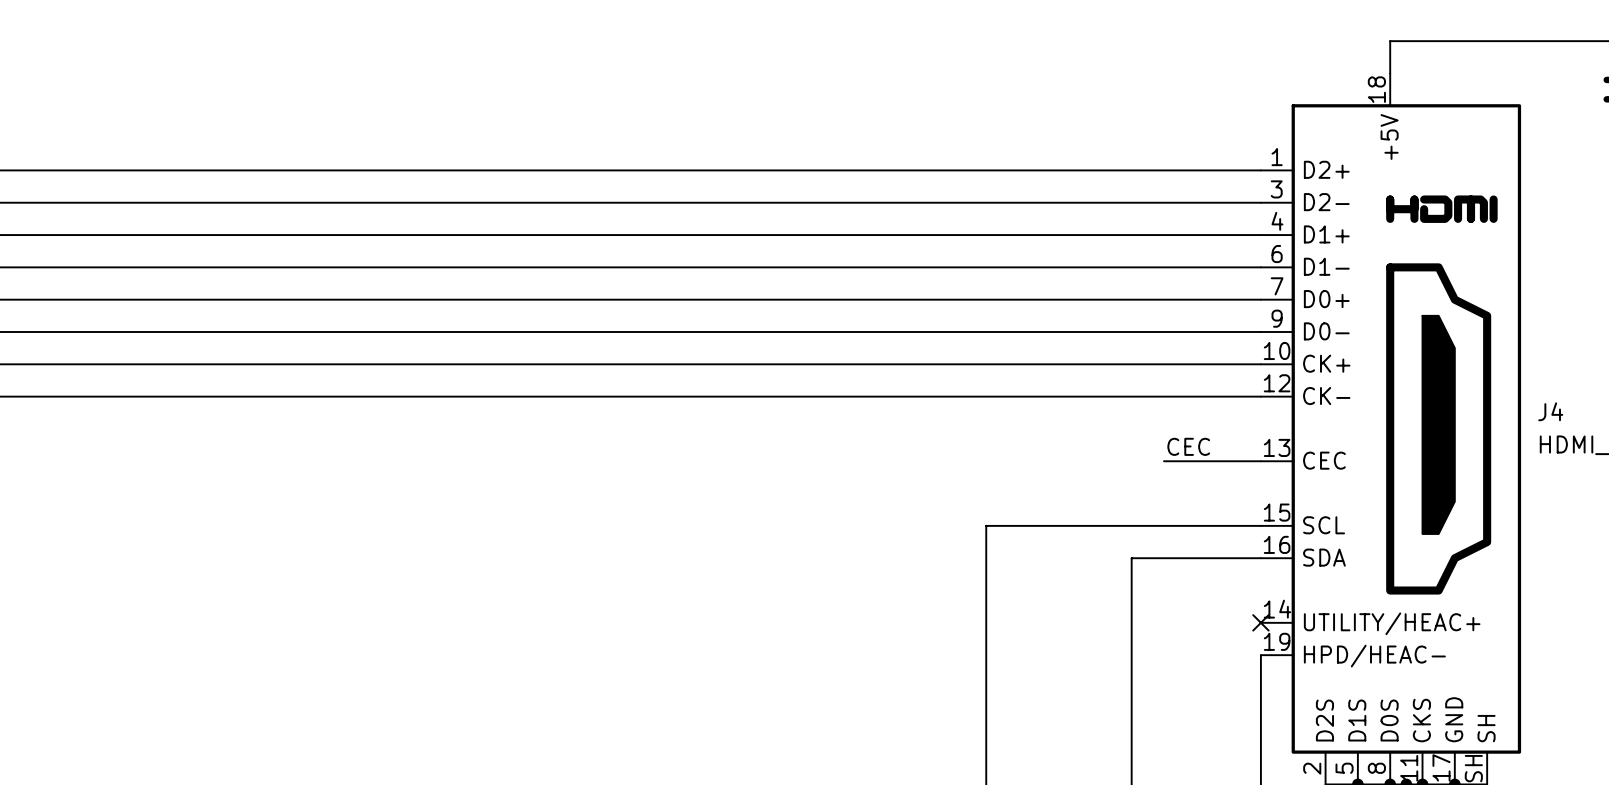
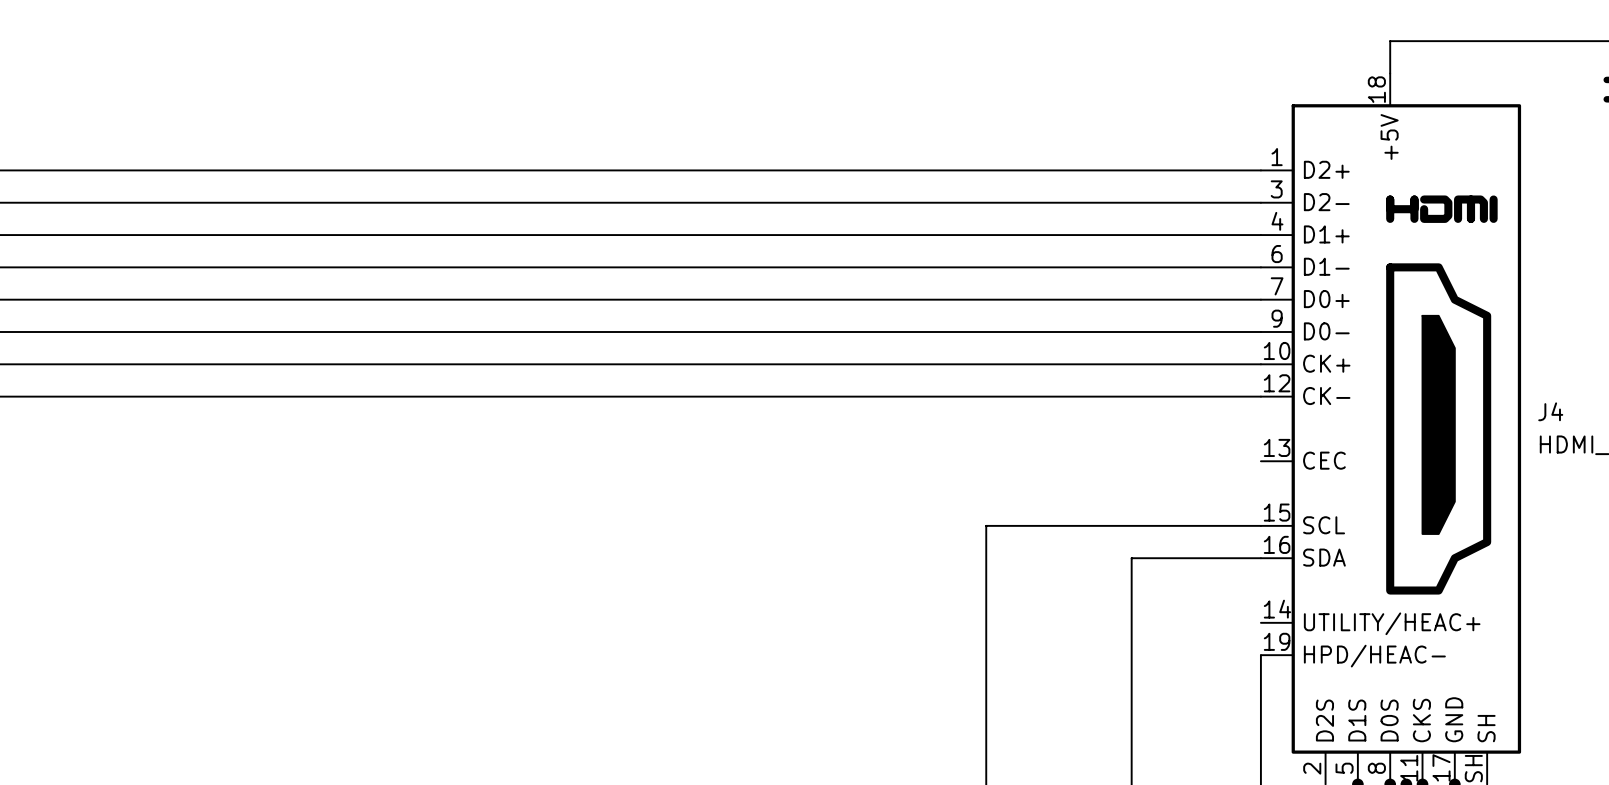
label: CEC (1188, 446) -> none
wire: (1163, 461) (1260, 461) -> none
no-connect mark: (1260, 622) -> none
wire: (1325, 784) (1487, 784) -> none

